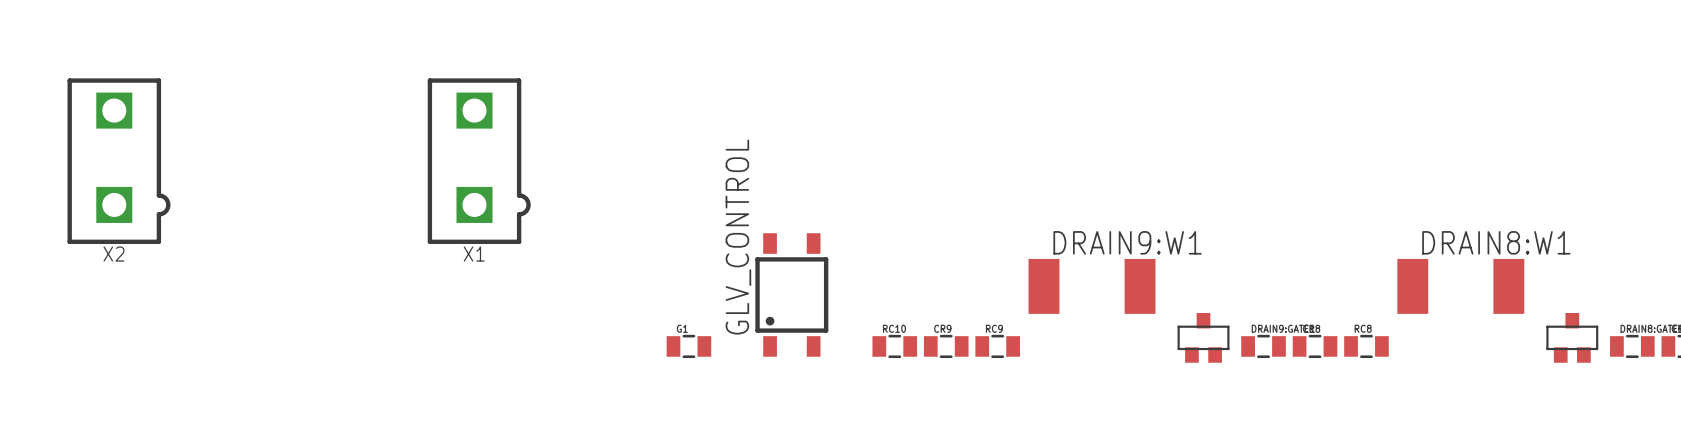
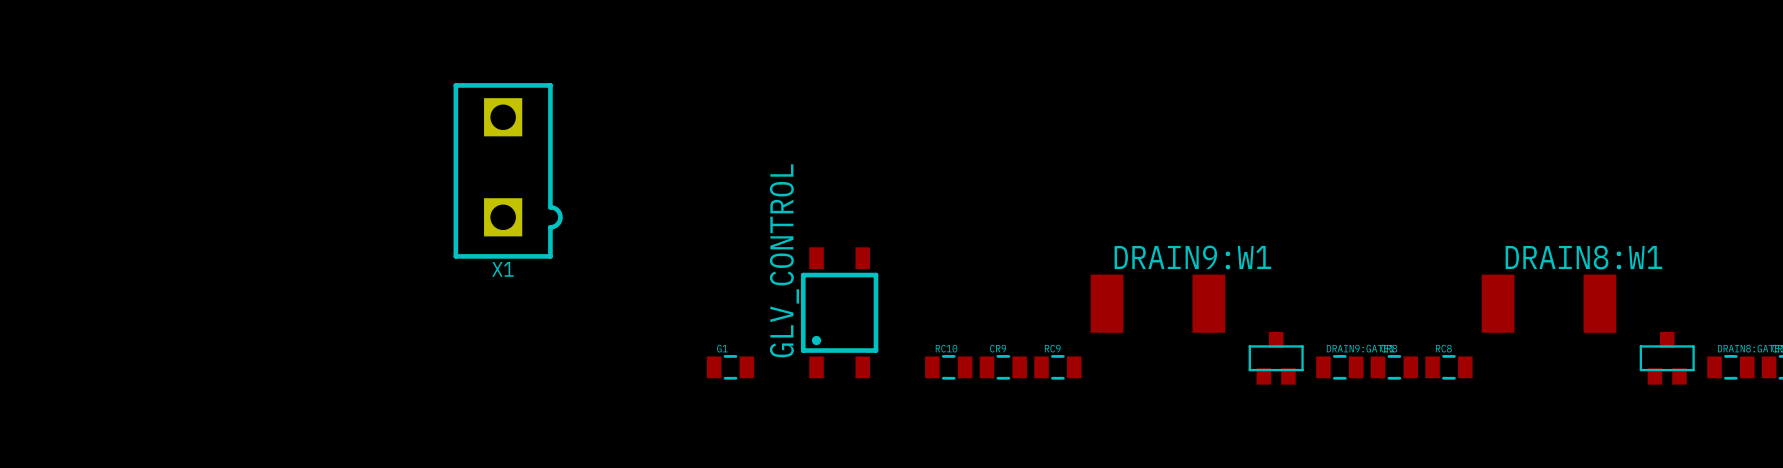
X2: (119, 161) -> none

